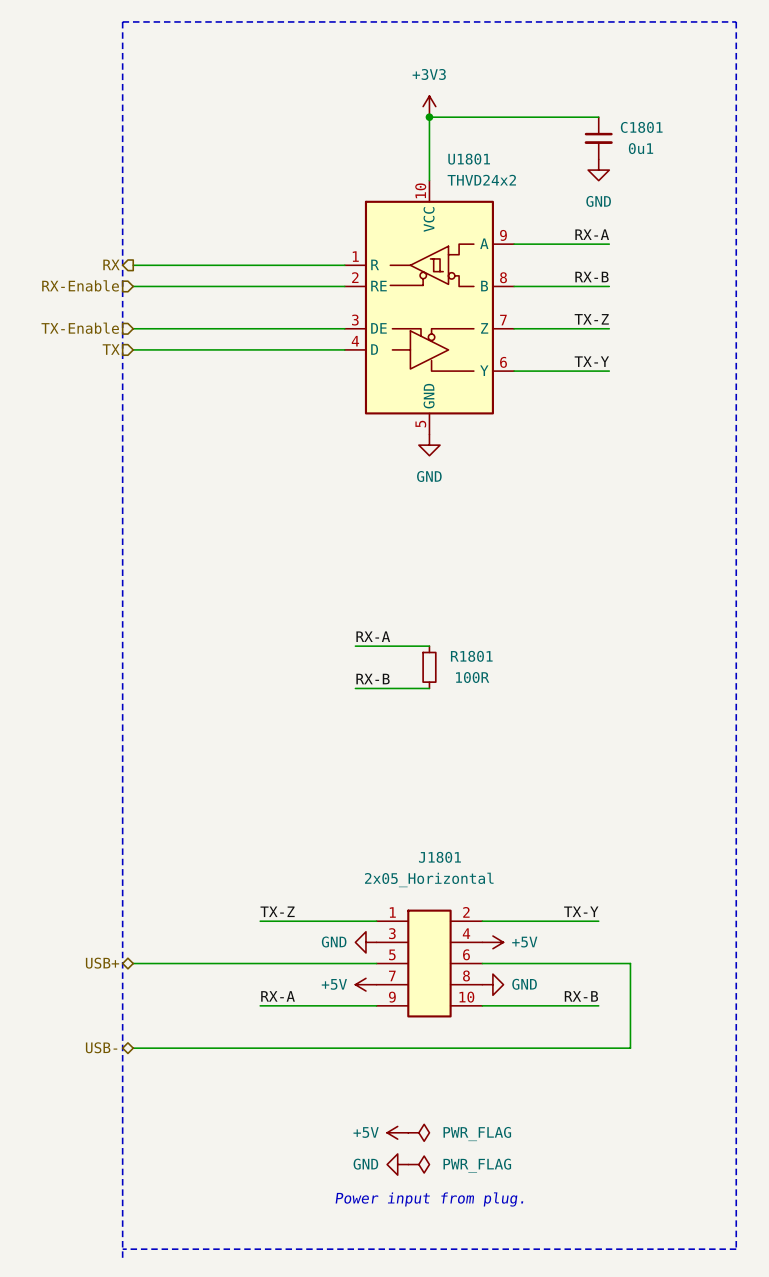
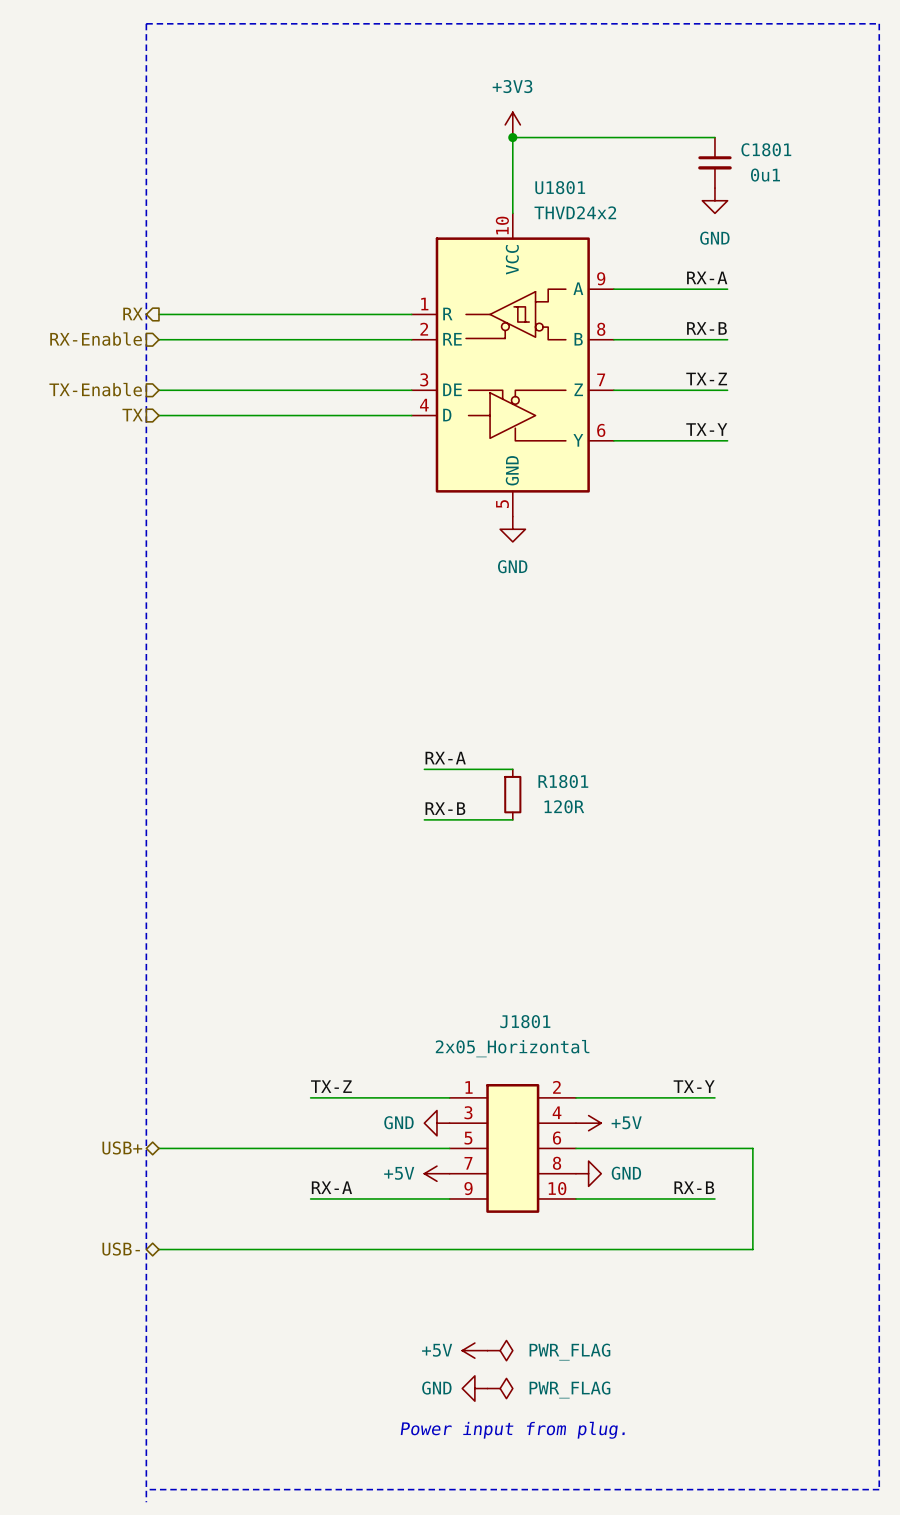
R1801 value: 100R (472, 677) -> 120R (564, 806)

